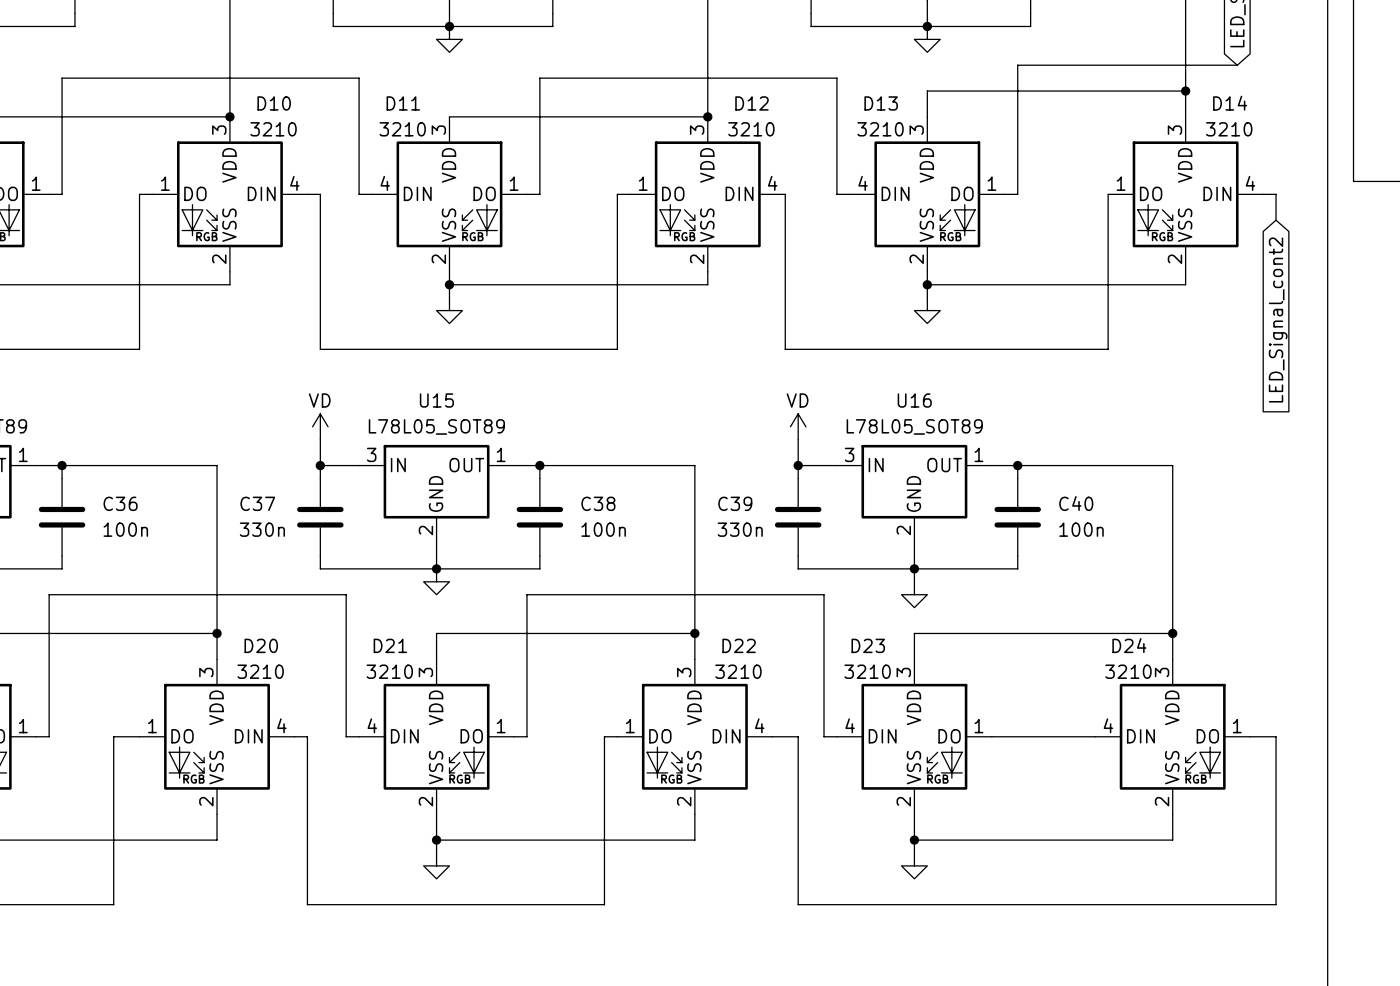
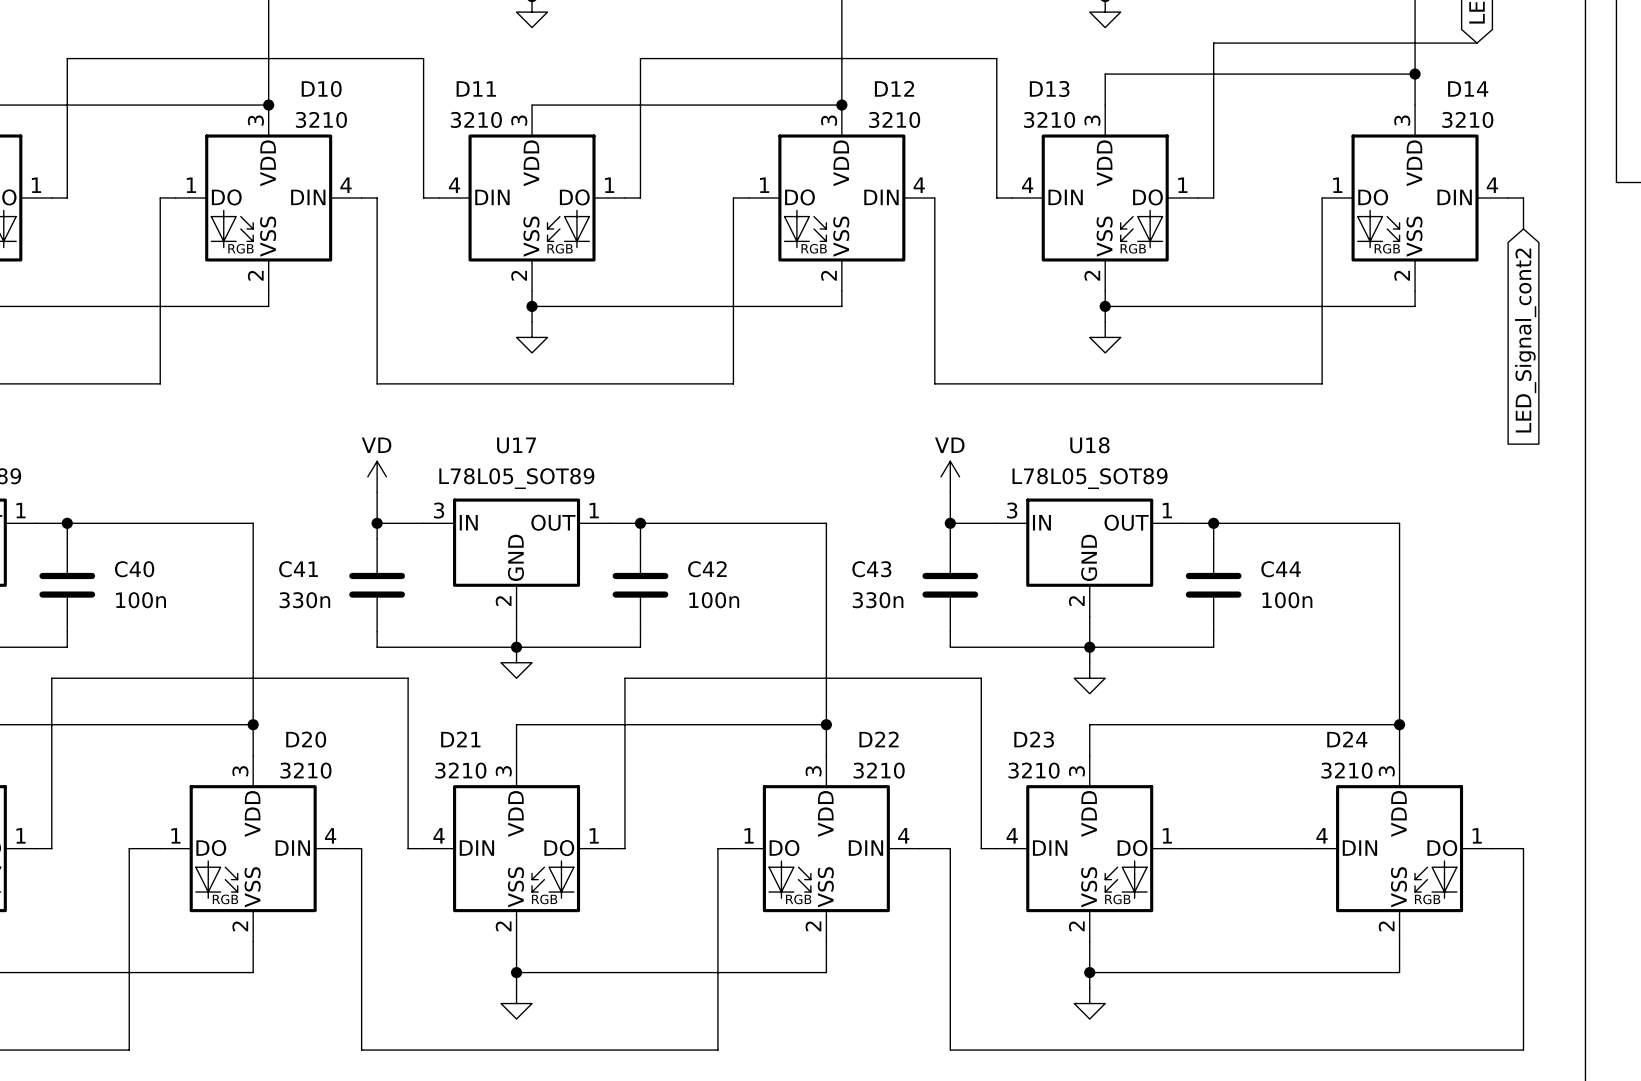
U15 name: U15 (436, 400) -> U17 (516, 445)
U16 name: U16 (914, 400) -> U18 (1089, 445)
C36 name: C36 (120, 503) -> C40 (134, 569)
C37 name: C37 (257, 503) -> C41 (298, 569)
C38 name: C38 (598, 503) -> C42 (707, 569)
C39 name: C39 (735, 503) -> C43 (871, 569)
C40 name: C40 (1076, 503) -> C44 (1281, 569)

